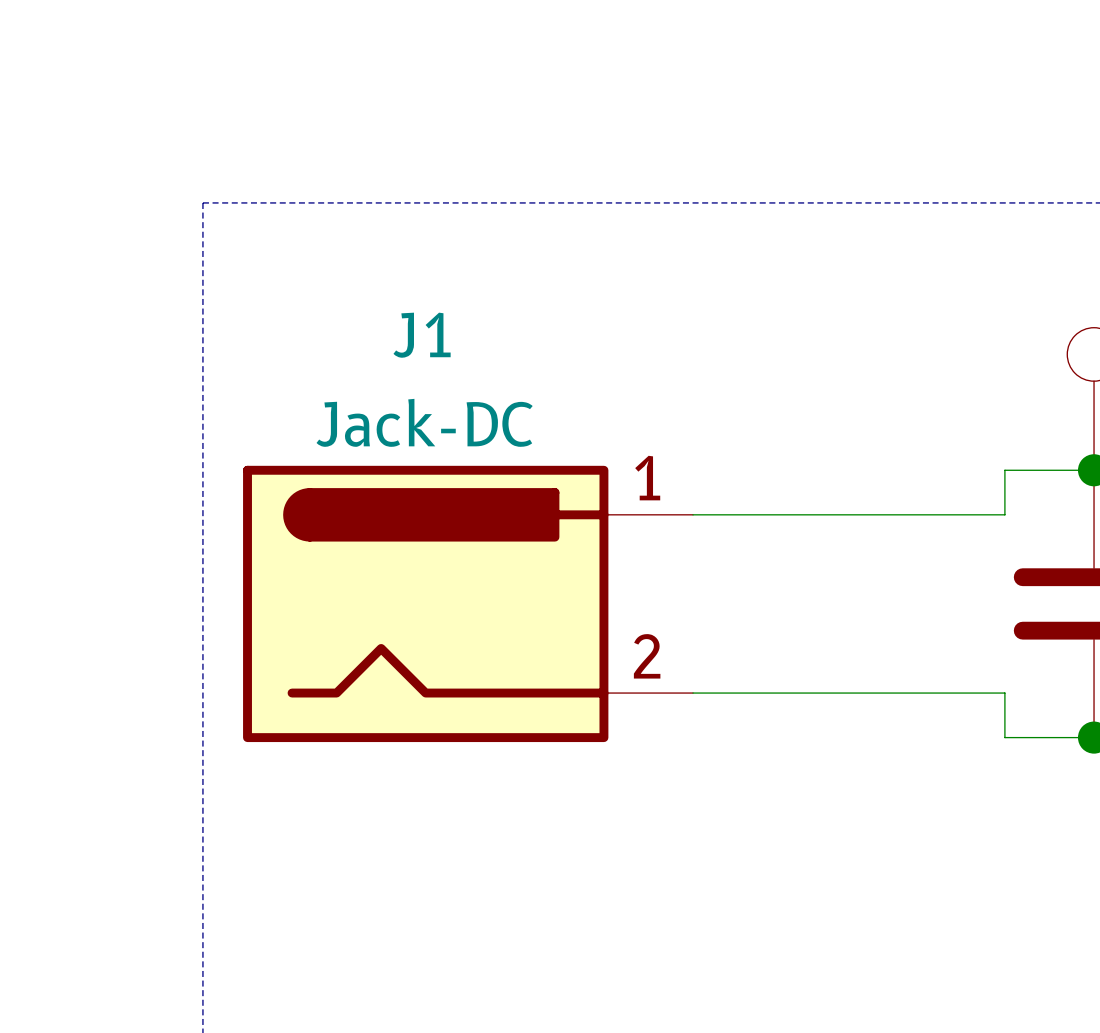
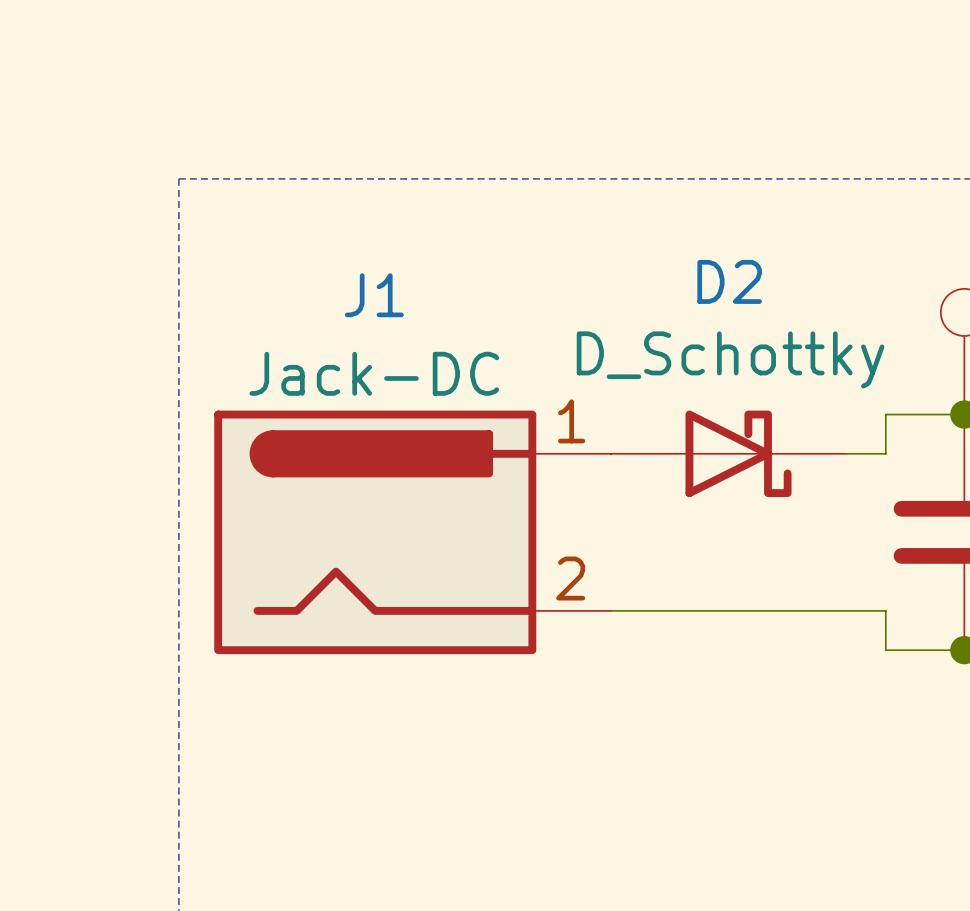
D2: none -> D_Schottky (728, 453)

